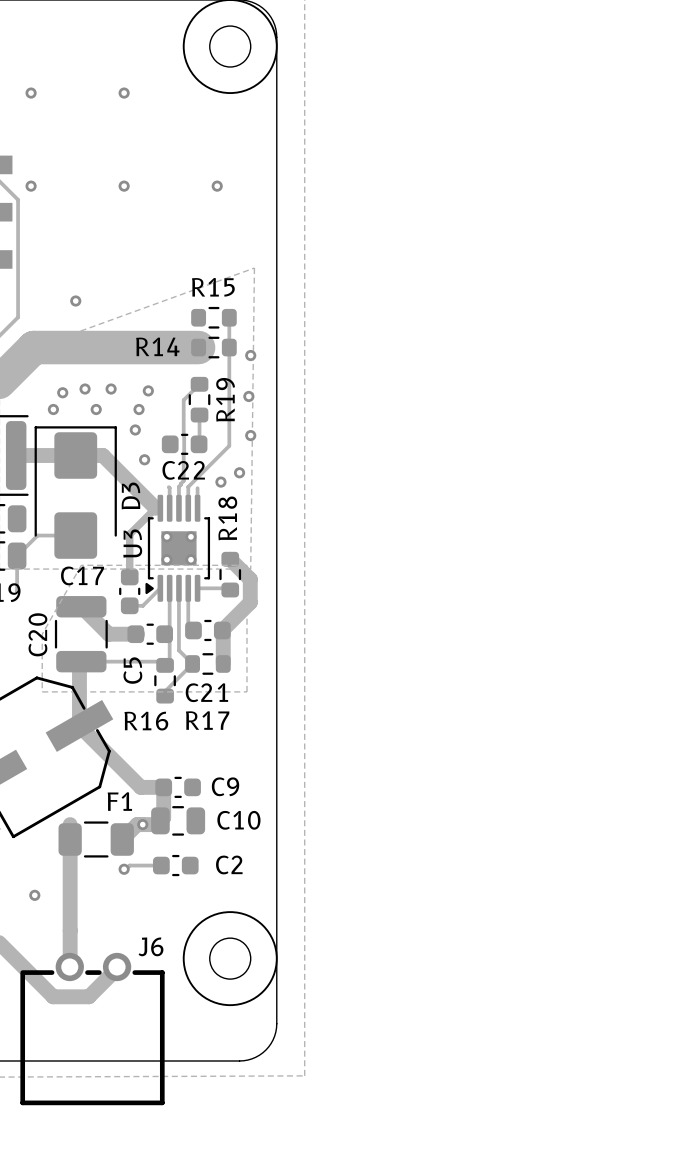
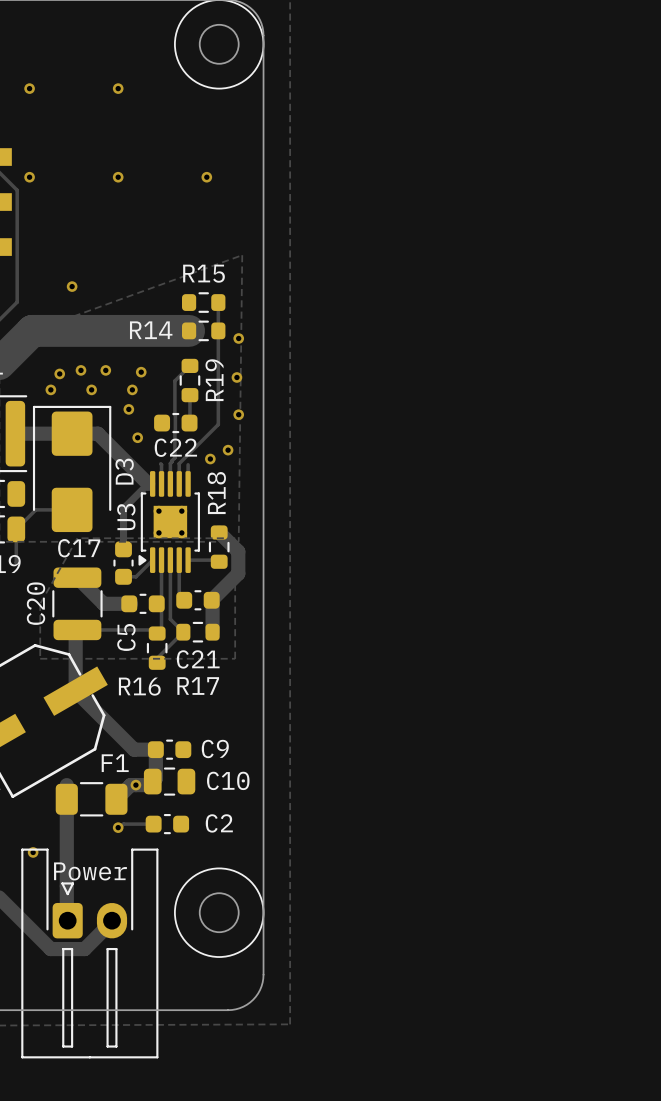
part: none -> Power (89, 953)
J6: (92, 1029) -> none

